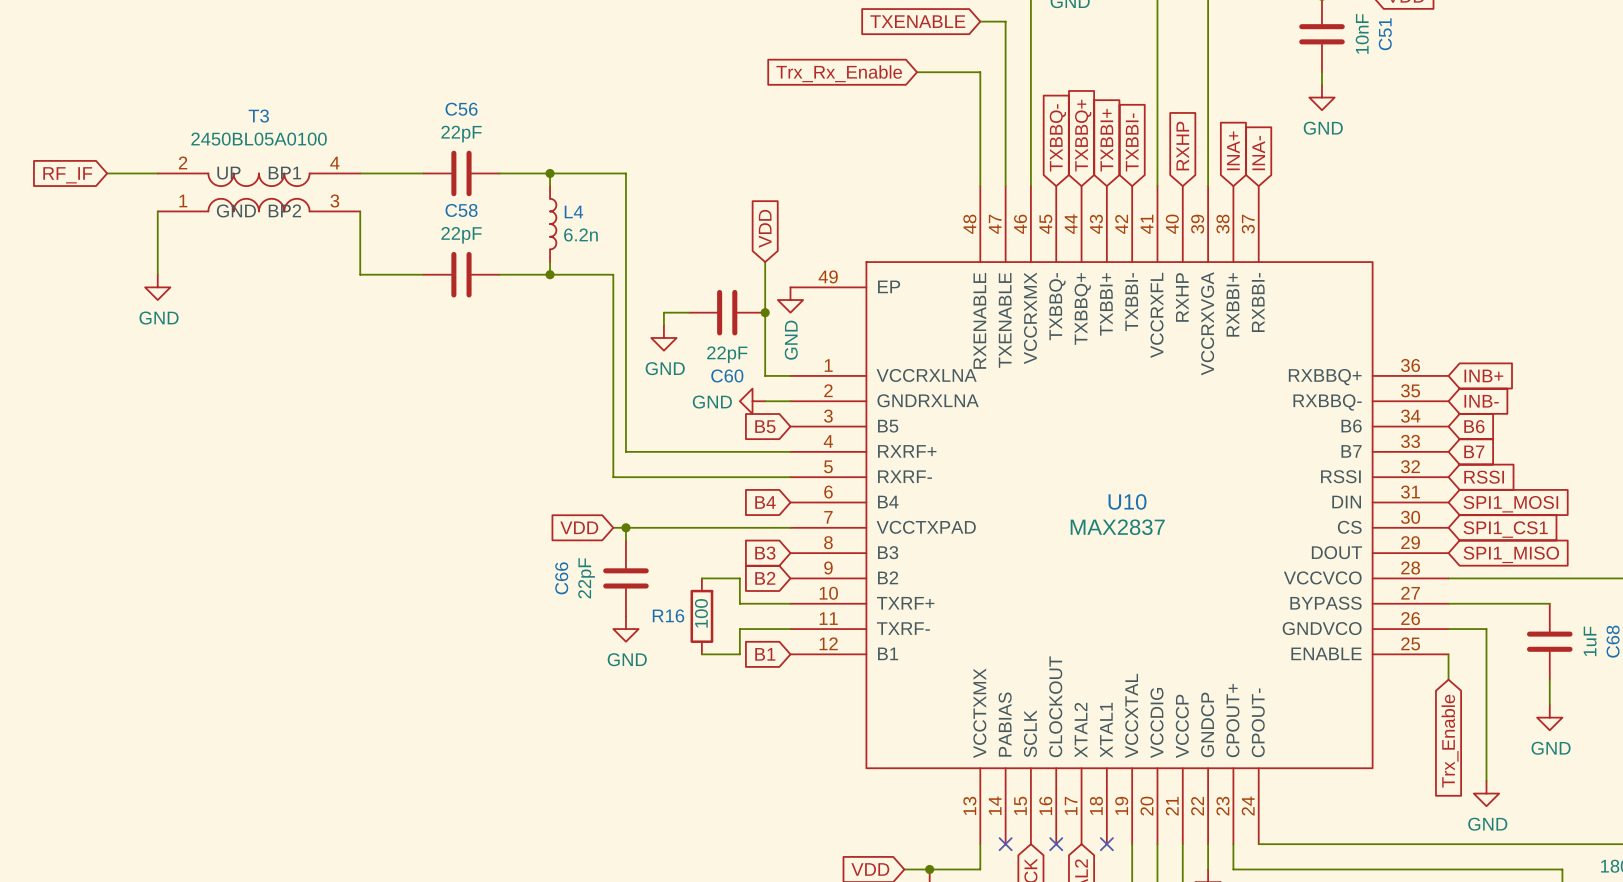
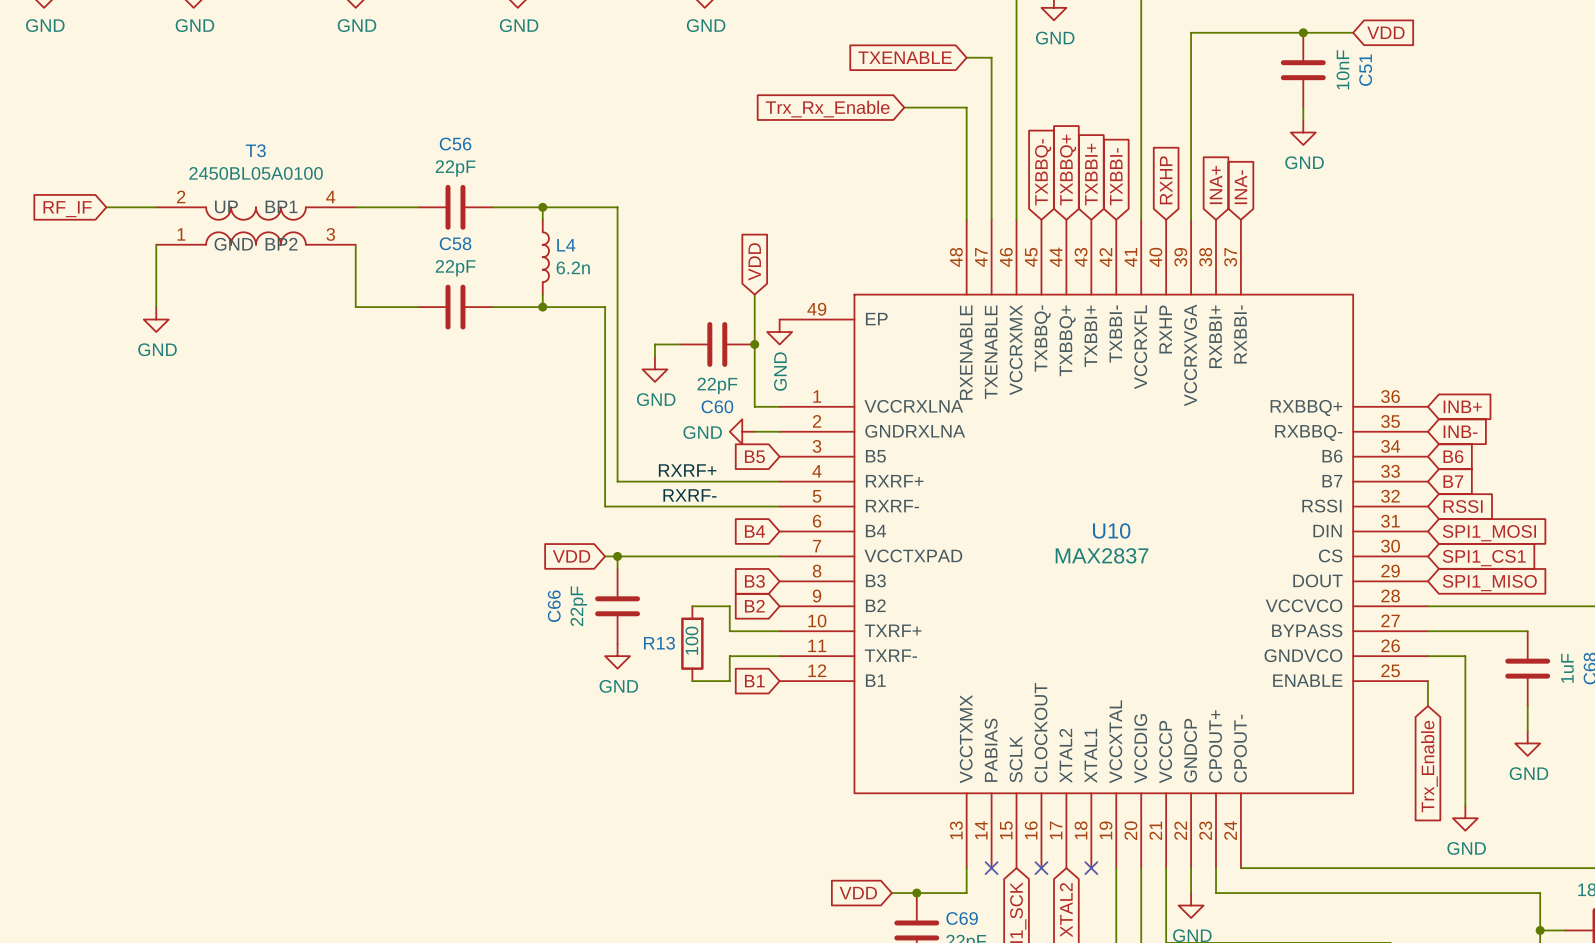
label: none -> RXRF+ (687, 470)
label: none -> RXRF- (689, 495)
R16 name: R16 (668, 615) -> R13 (659, 643)

